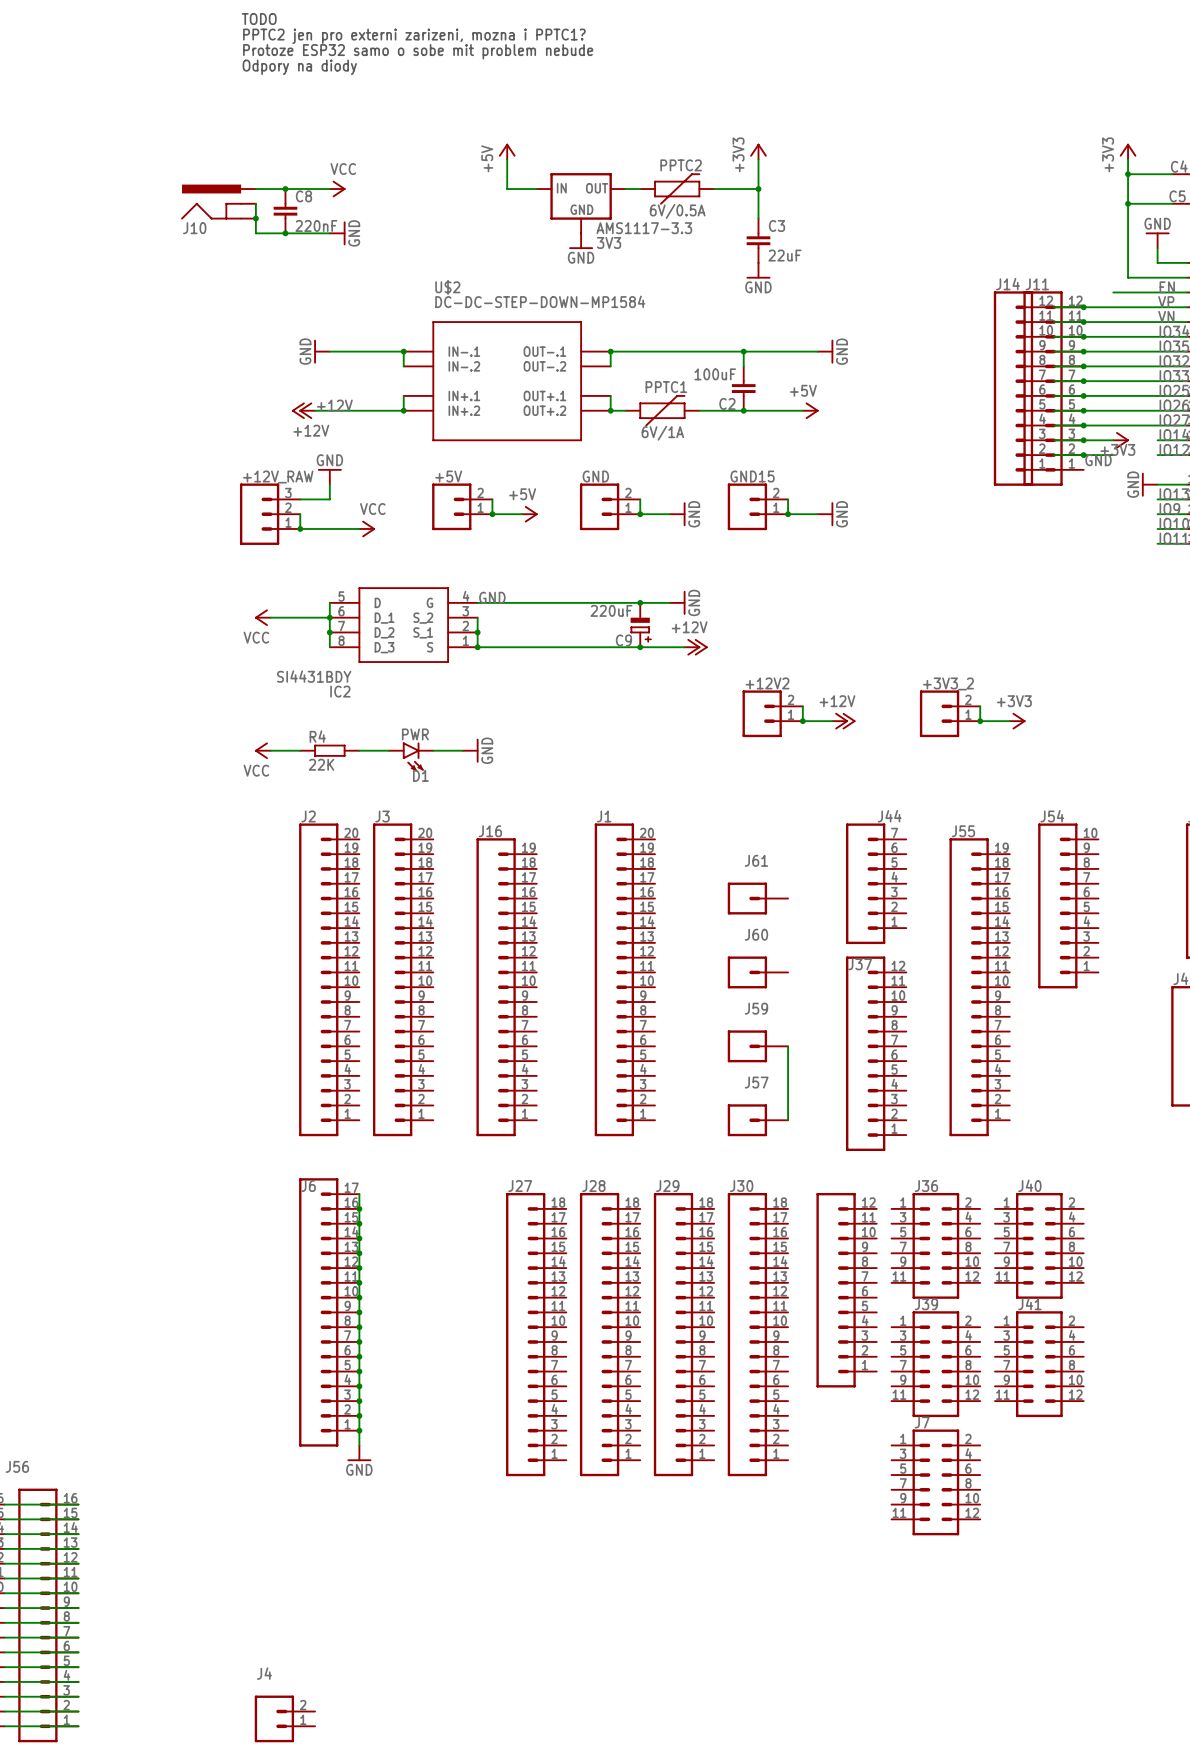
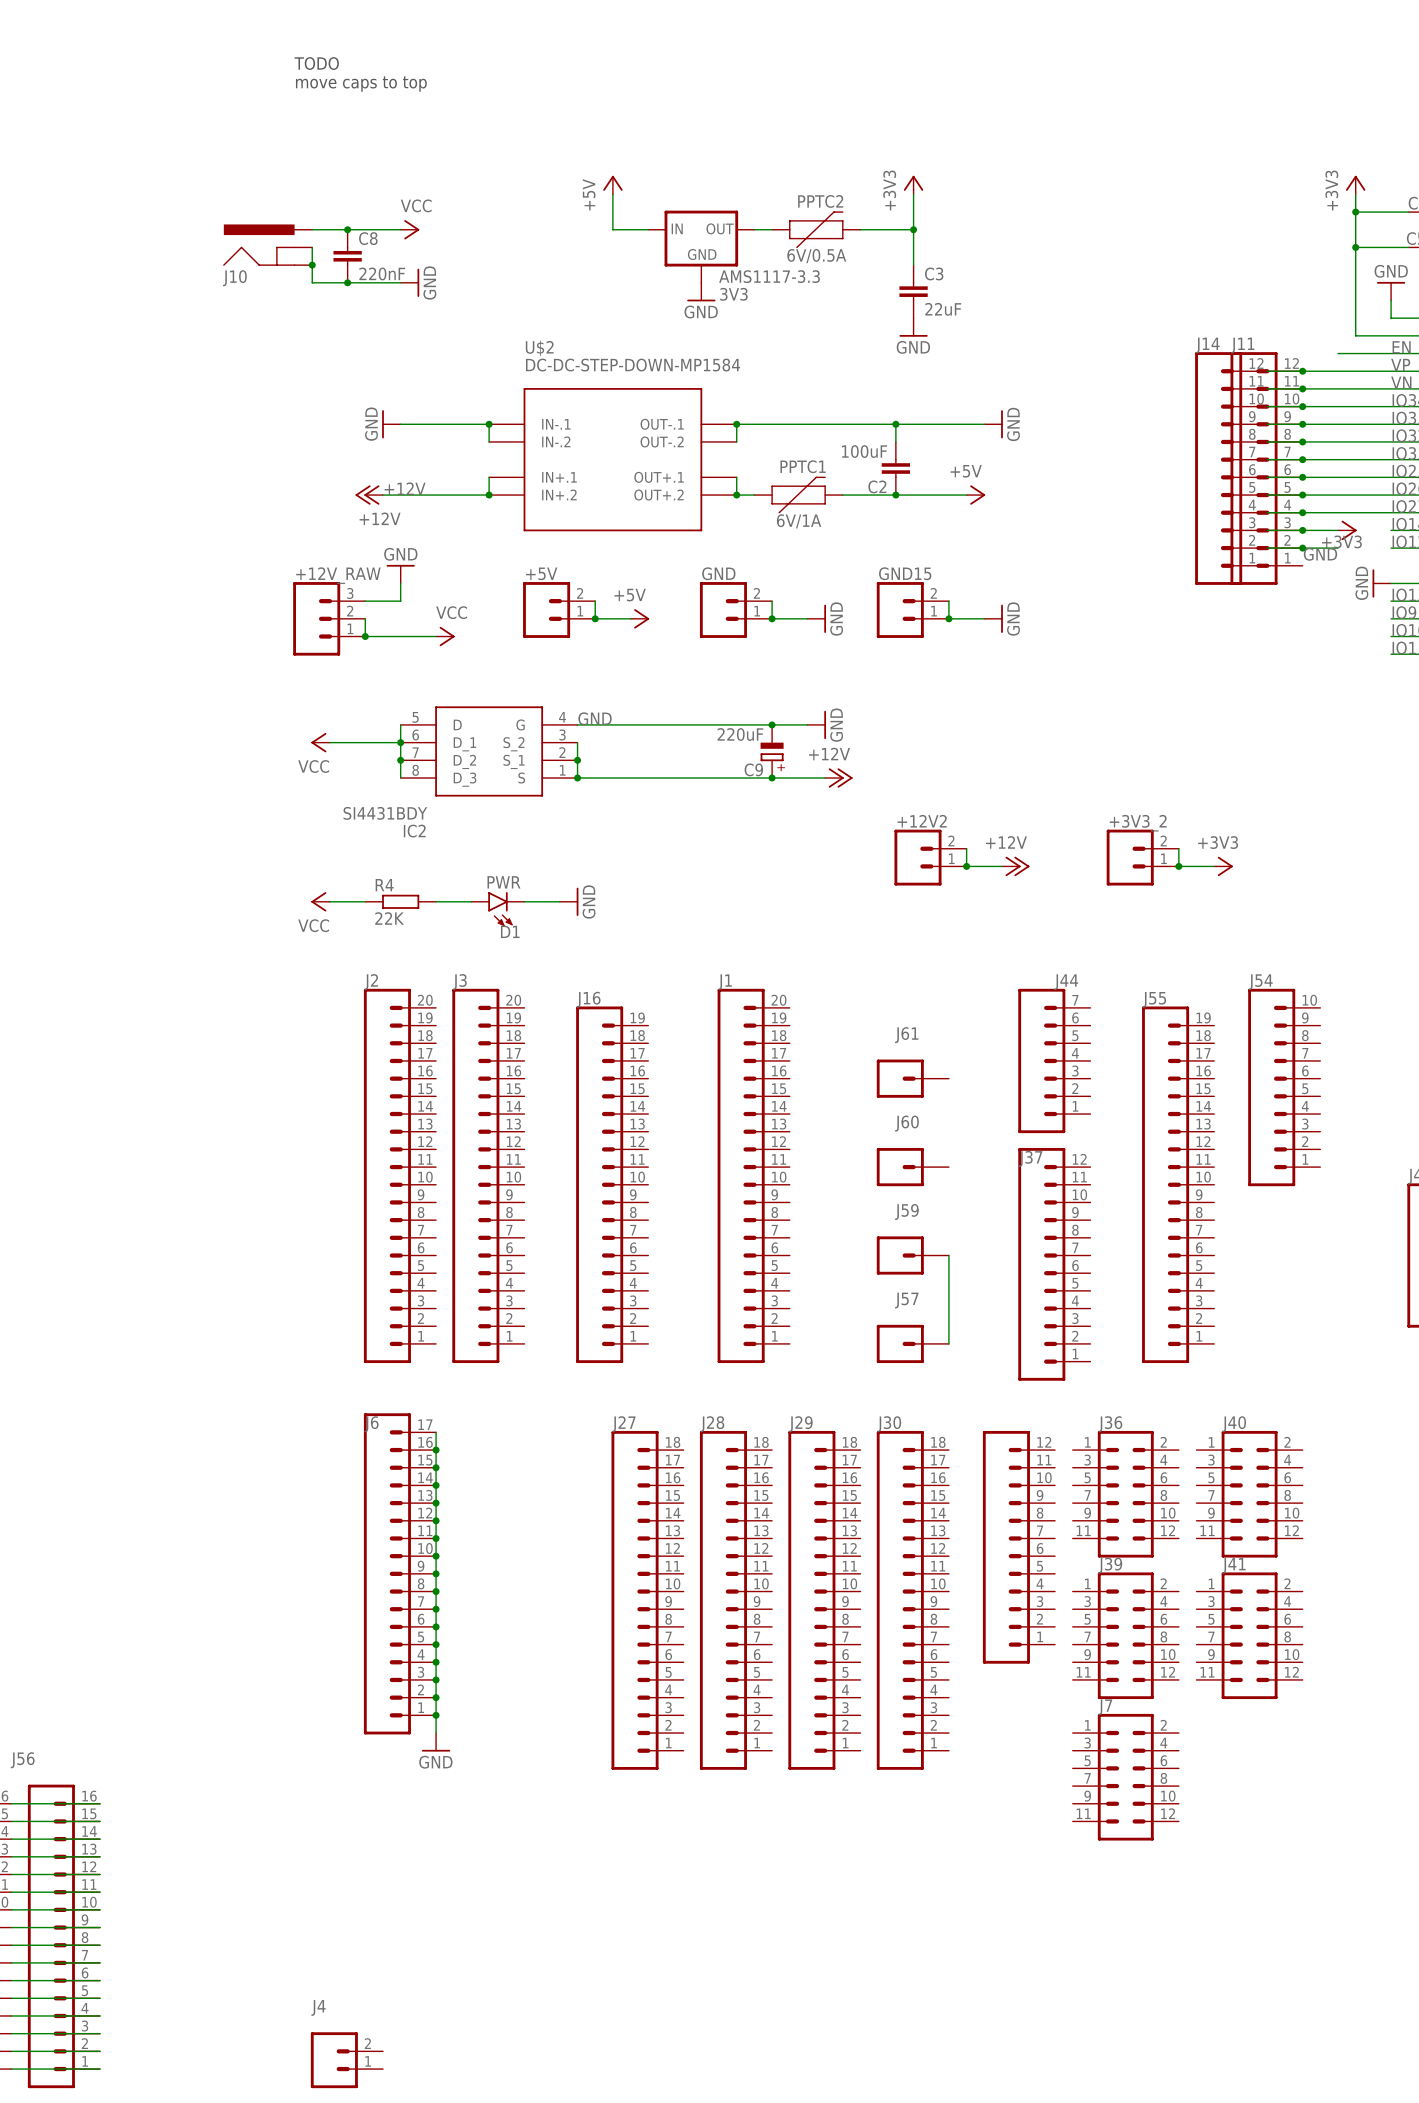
text: TODO (259, 19) -> none
text: PPTC2 jen pro externi zarizeni, mozna i PPTC1? (414, 36) -> none
text: Protoze ESP32 samo o sobe mit problem nebude (418, 51) -> TODO (316, 63)
text: Odpory na diody (299, 67) -> move caps to top (361, 84)

